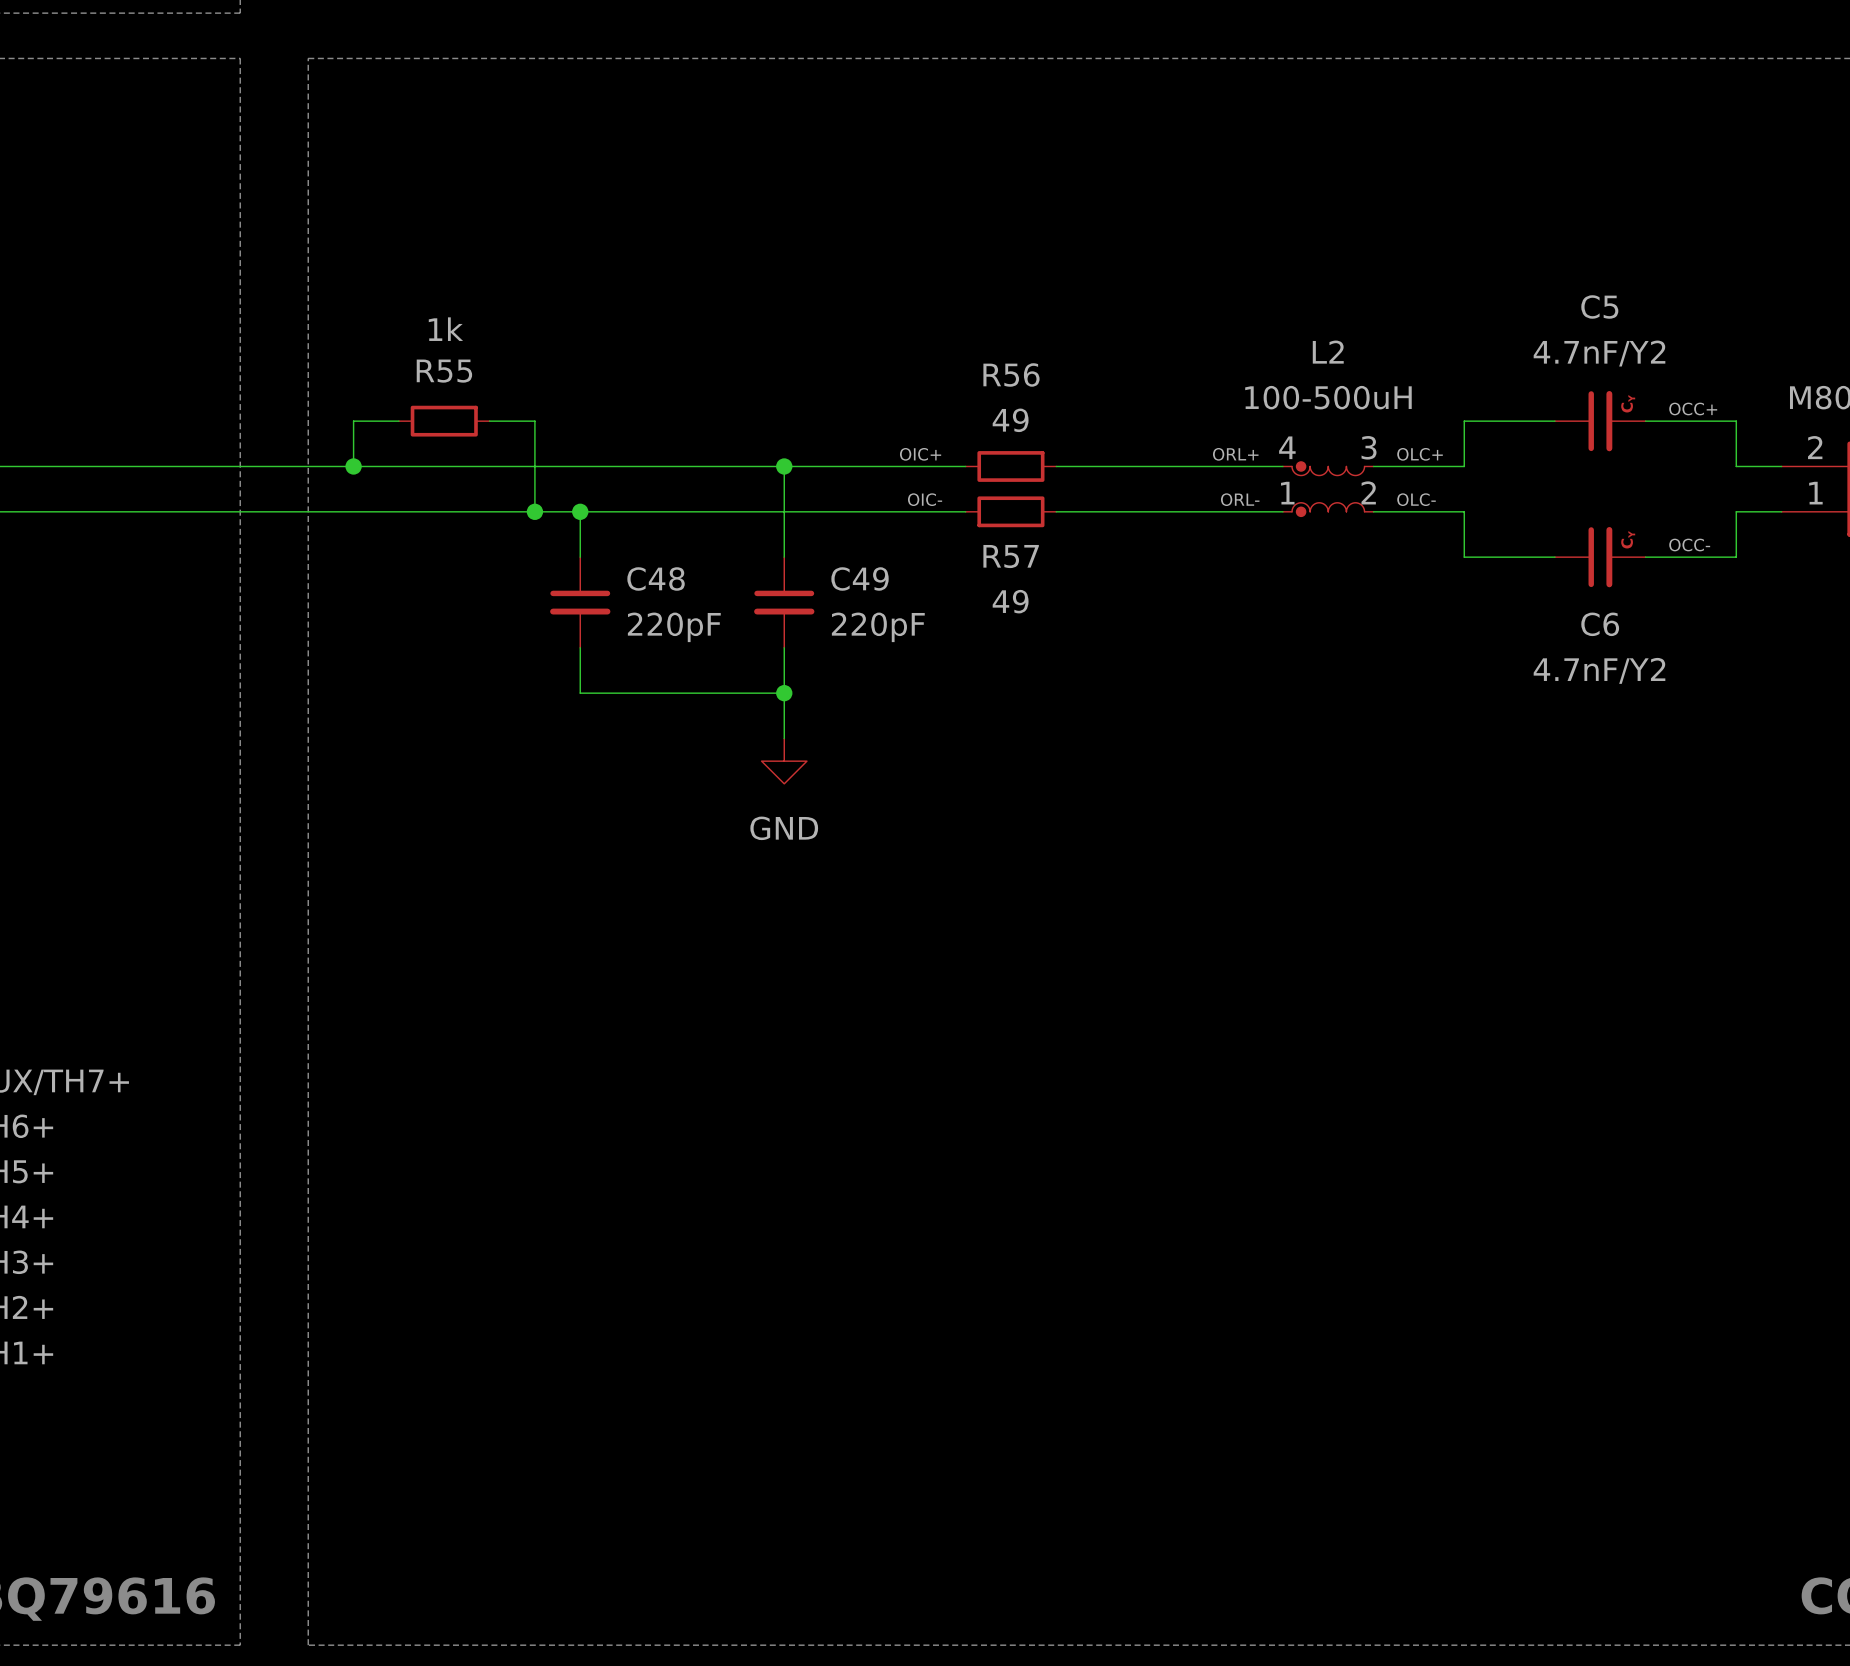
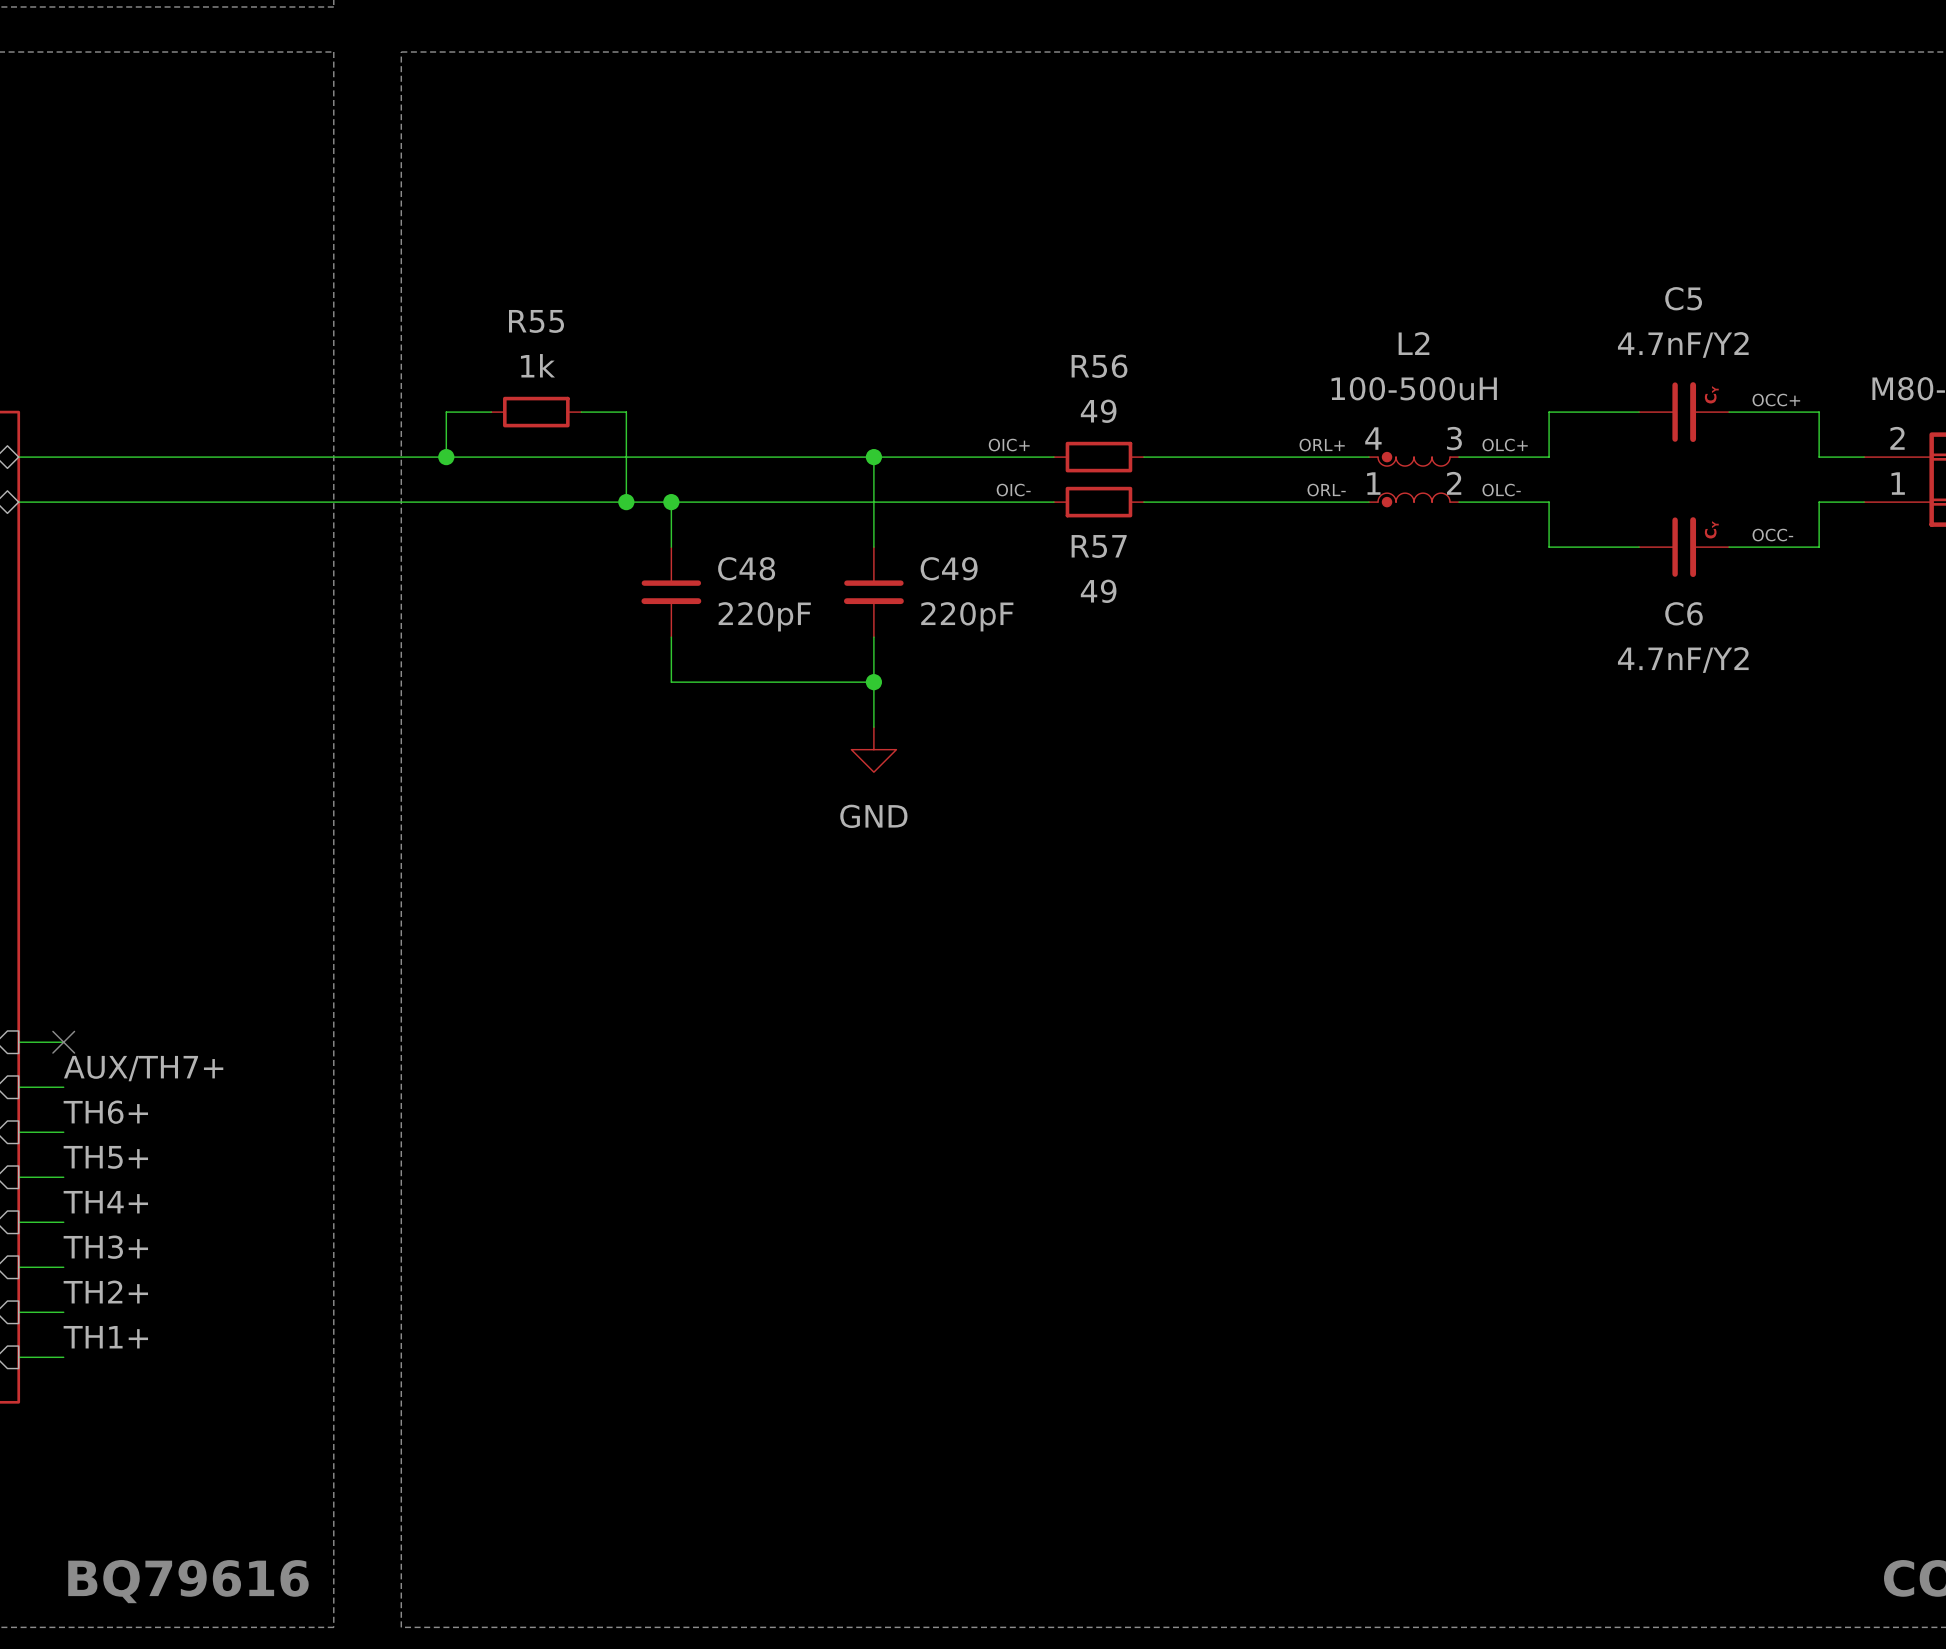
R55 value position: 1k (445, 329) -> 1k (537, 365)
R55 name position: R55 (444, 371) -> R55 (536, 321)

